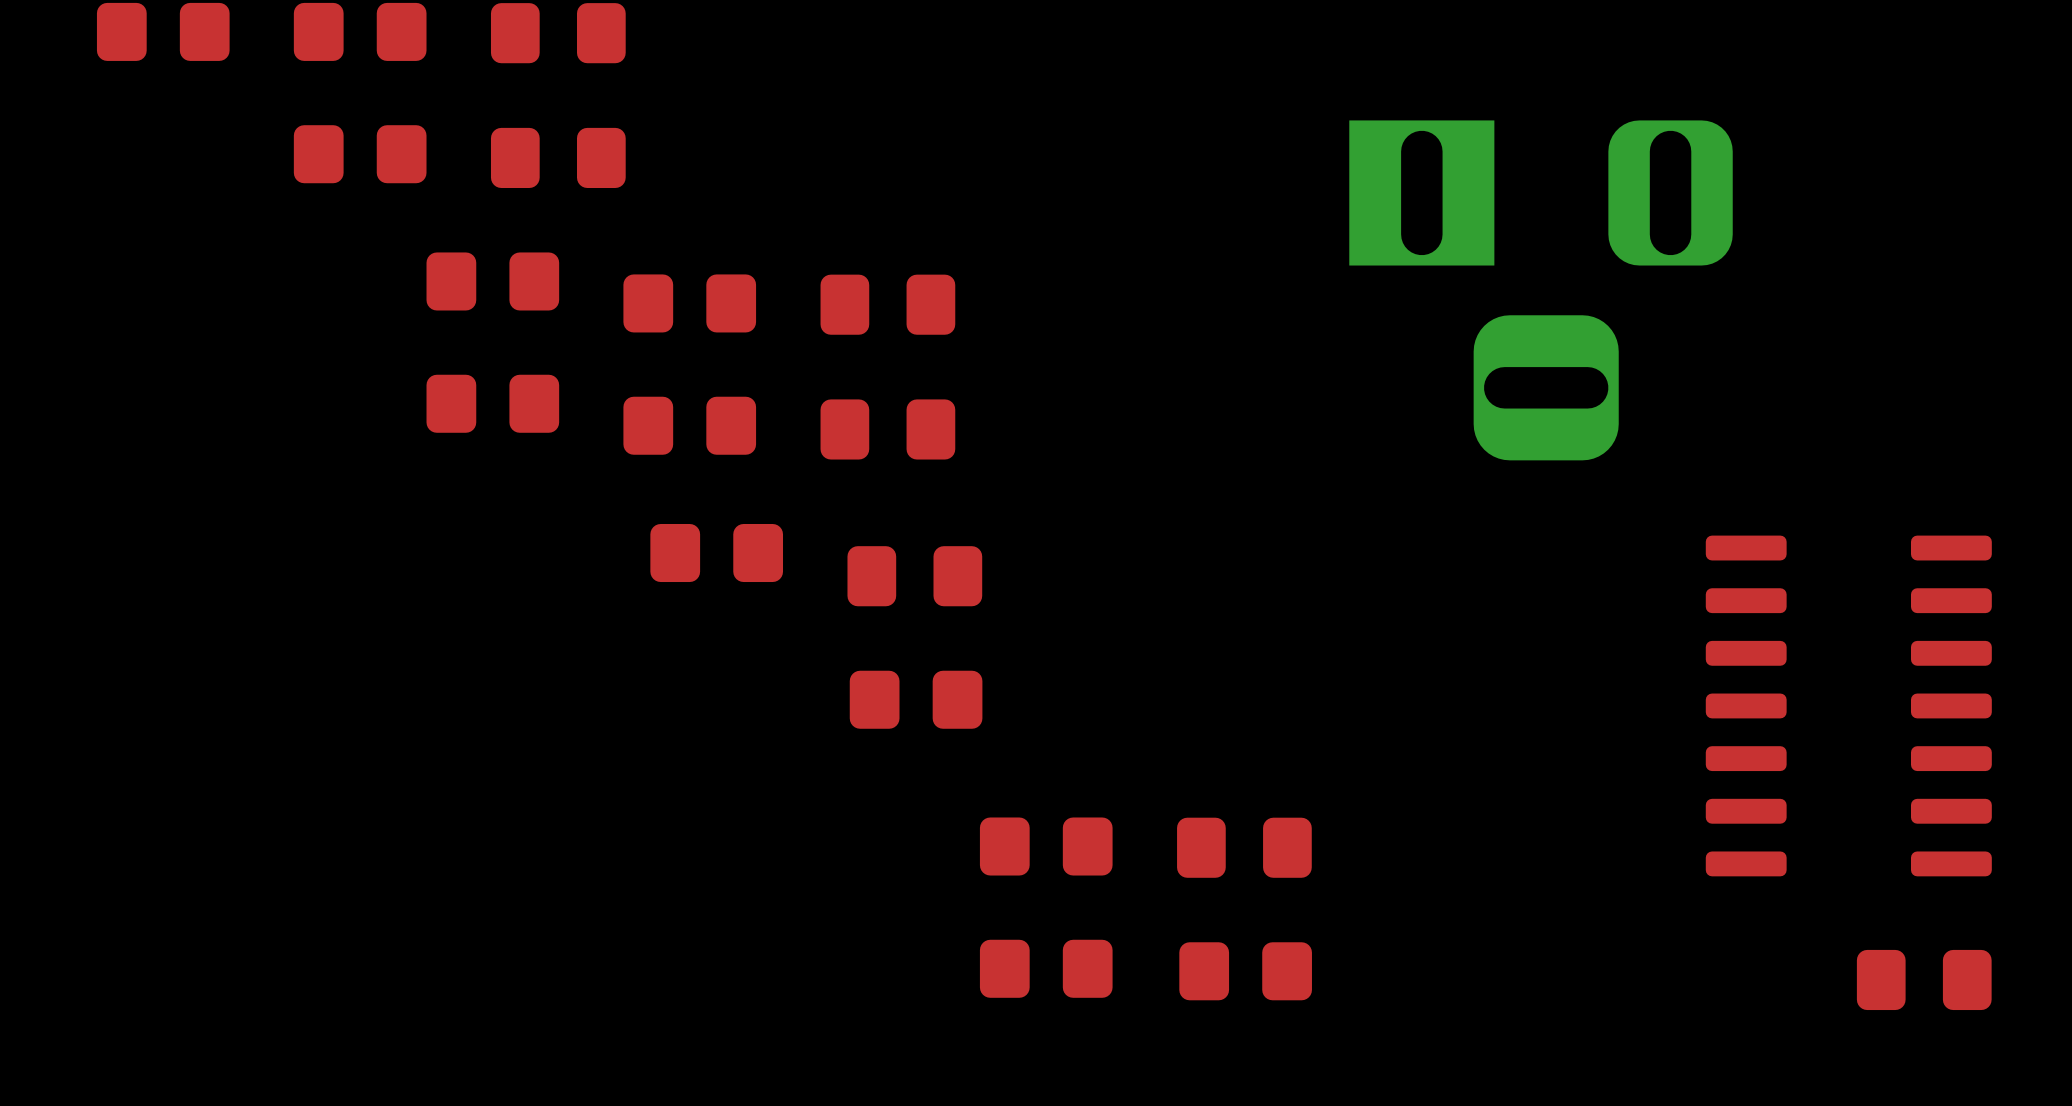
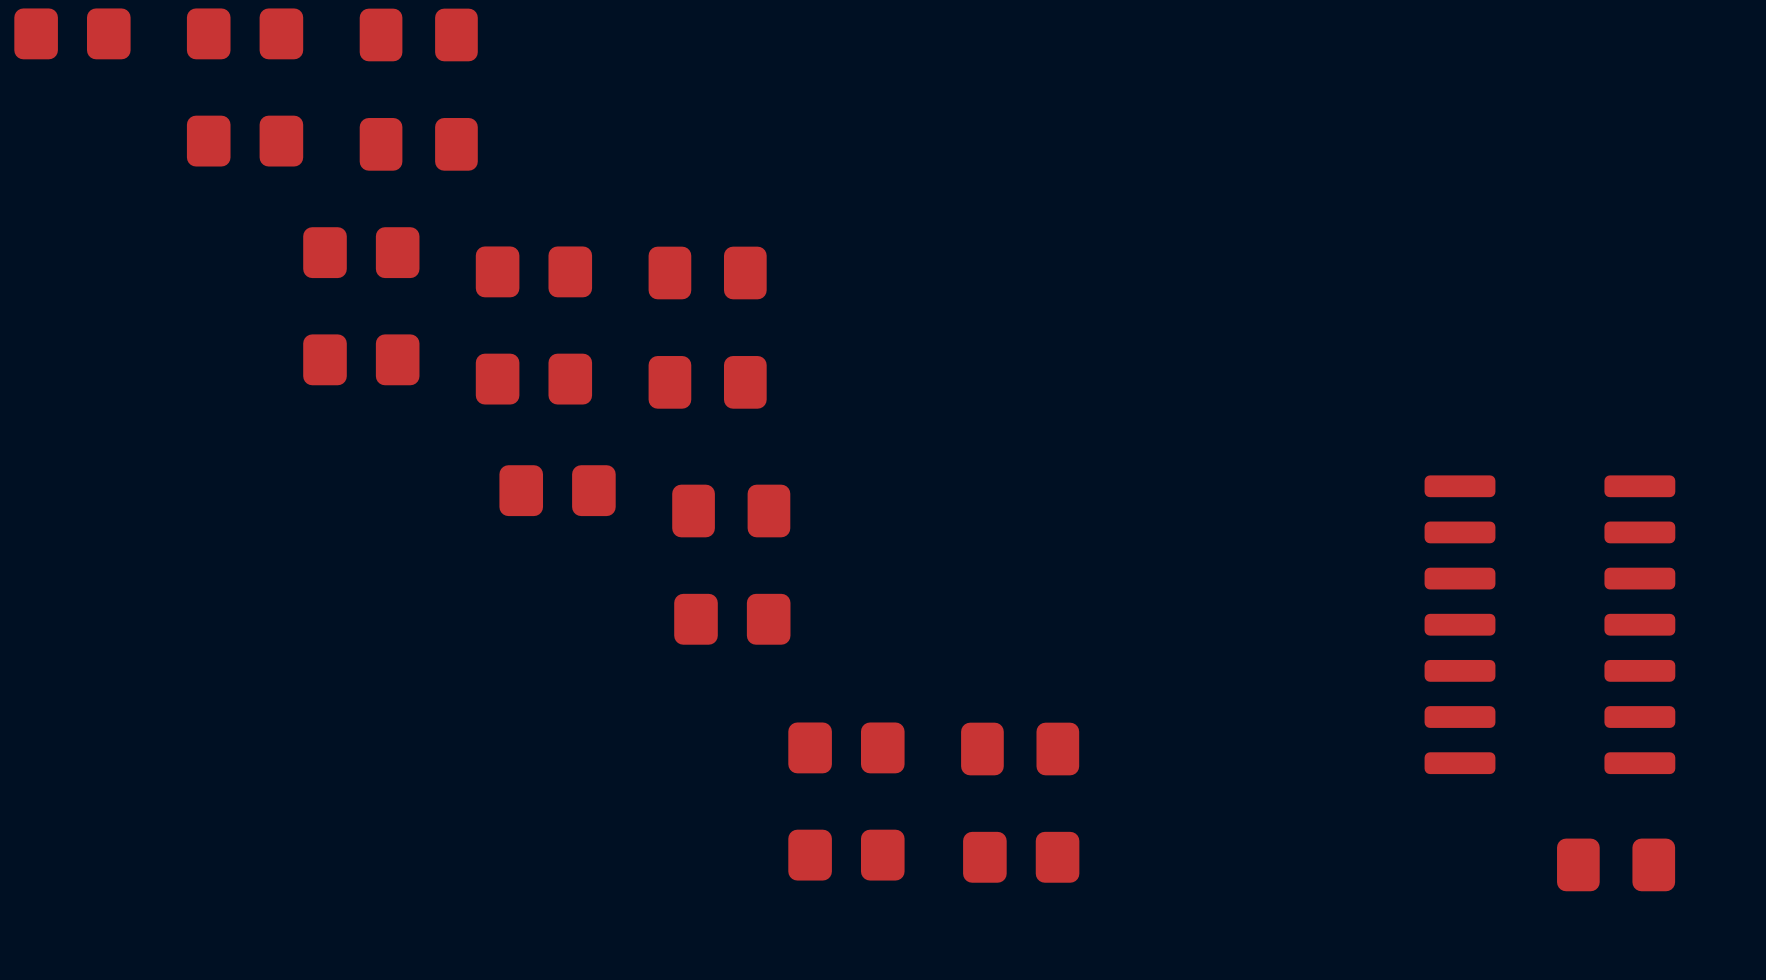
part: (1541, 290) -> none

